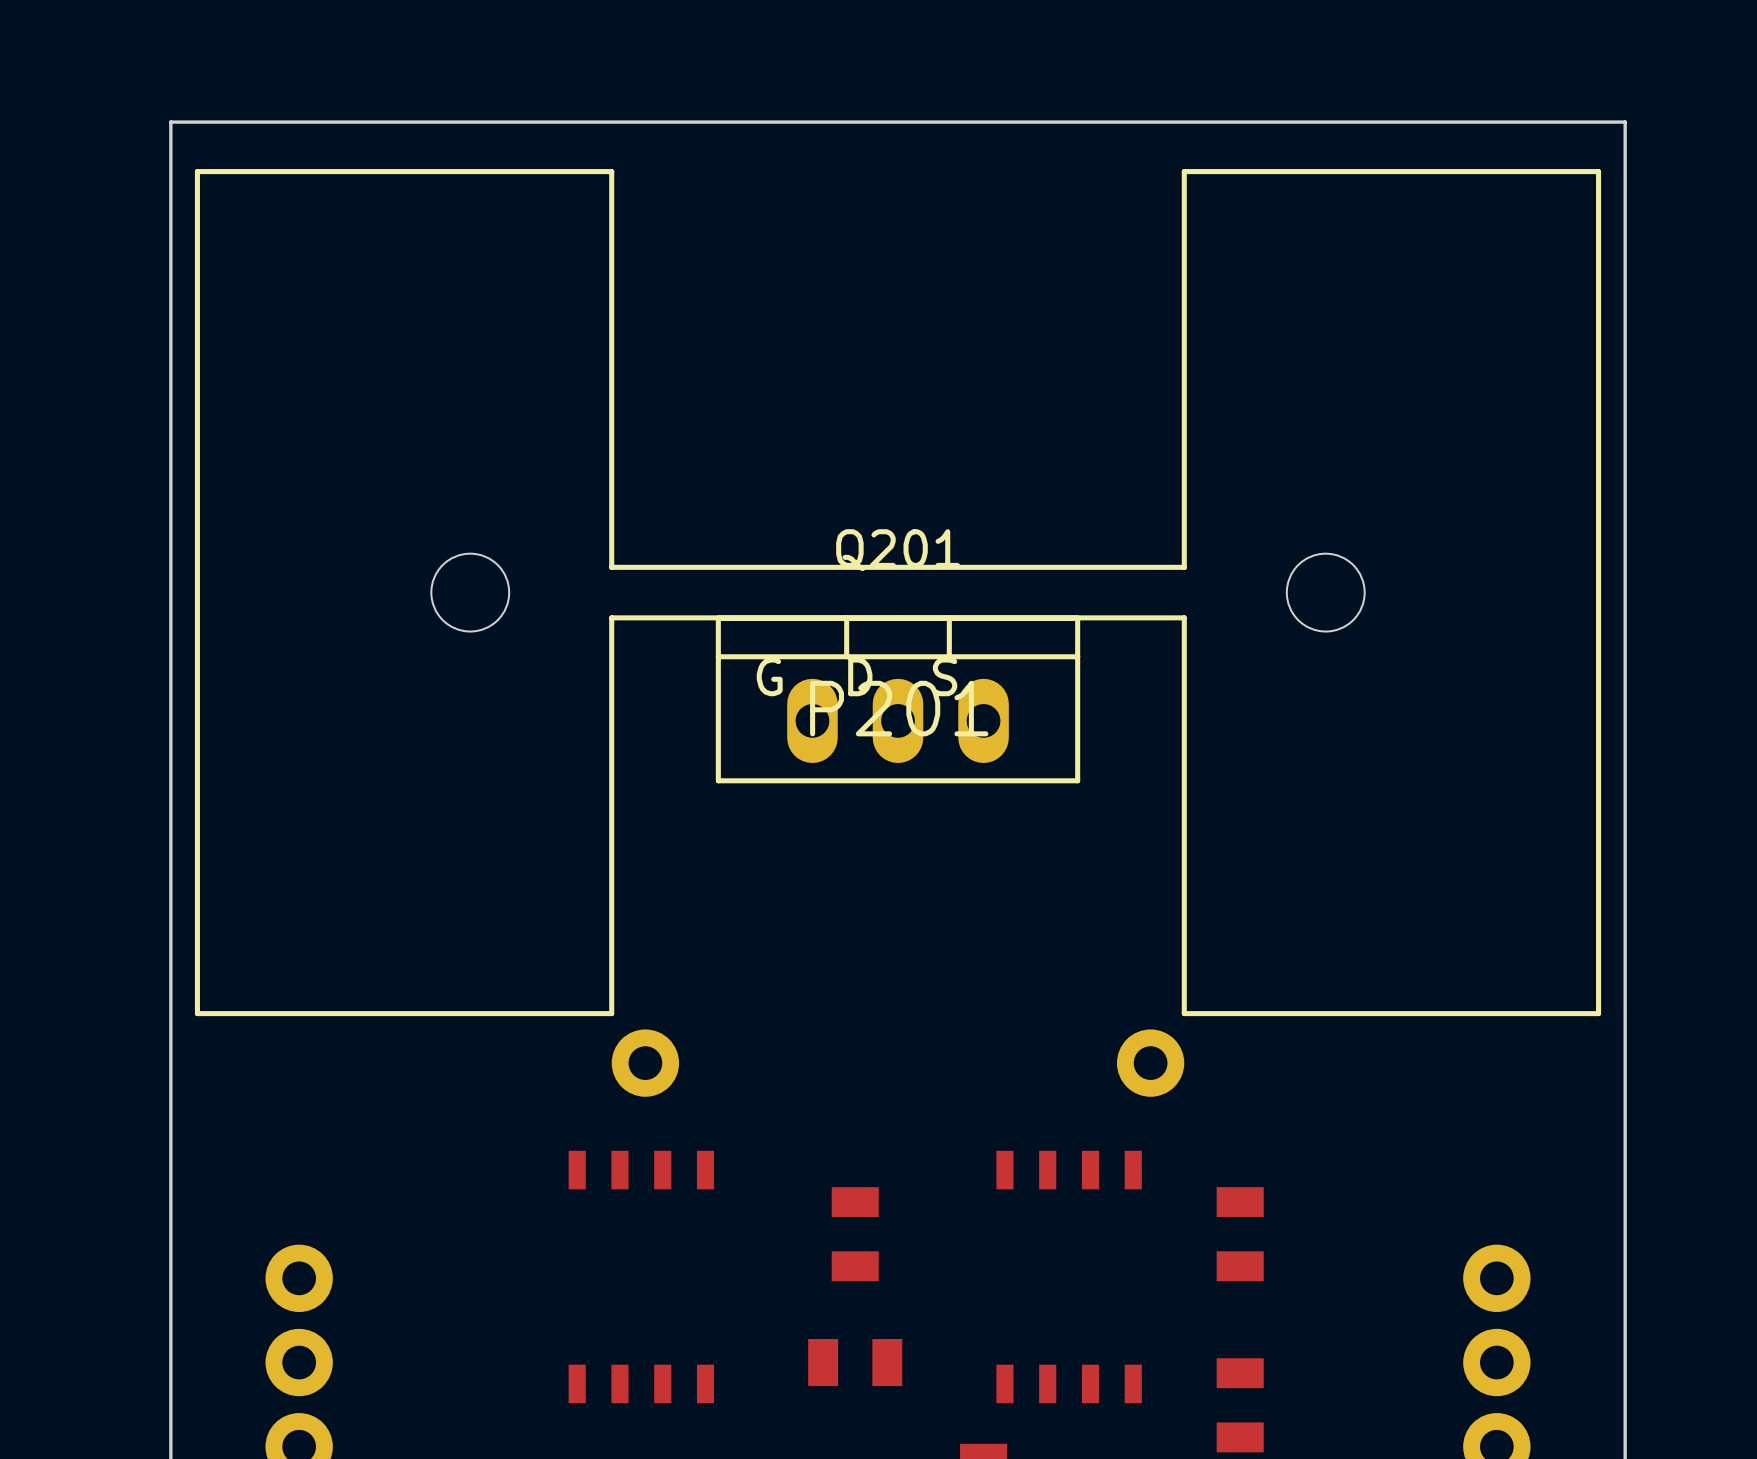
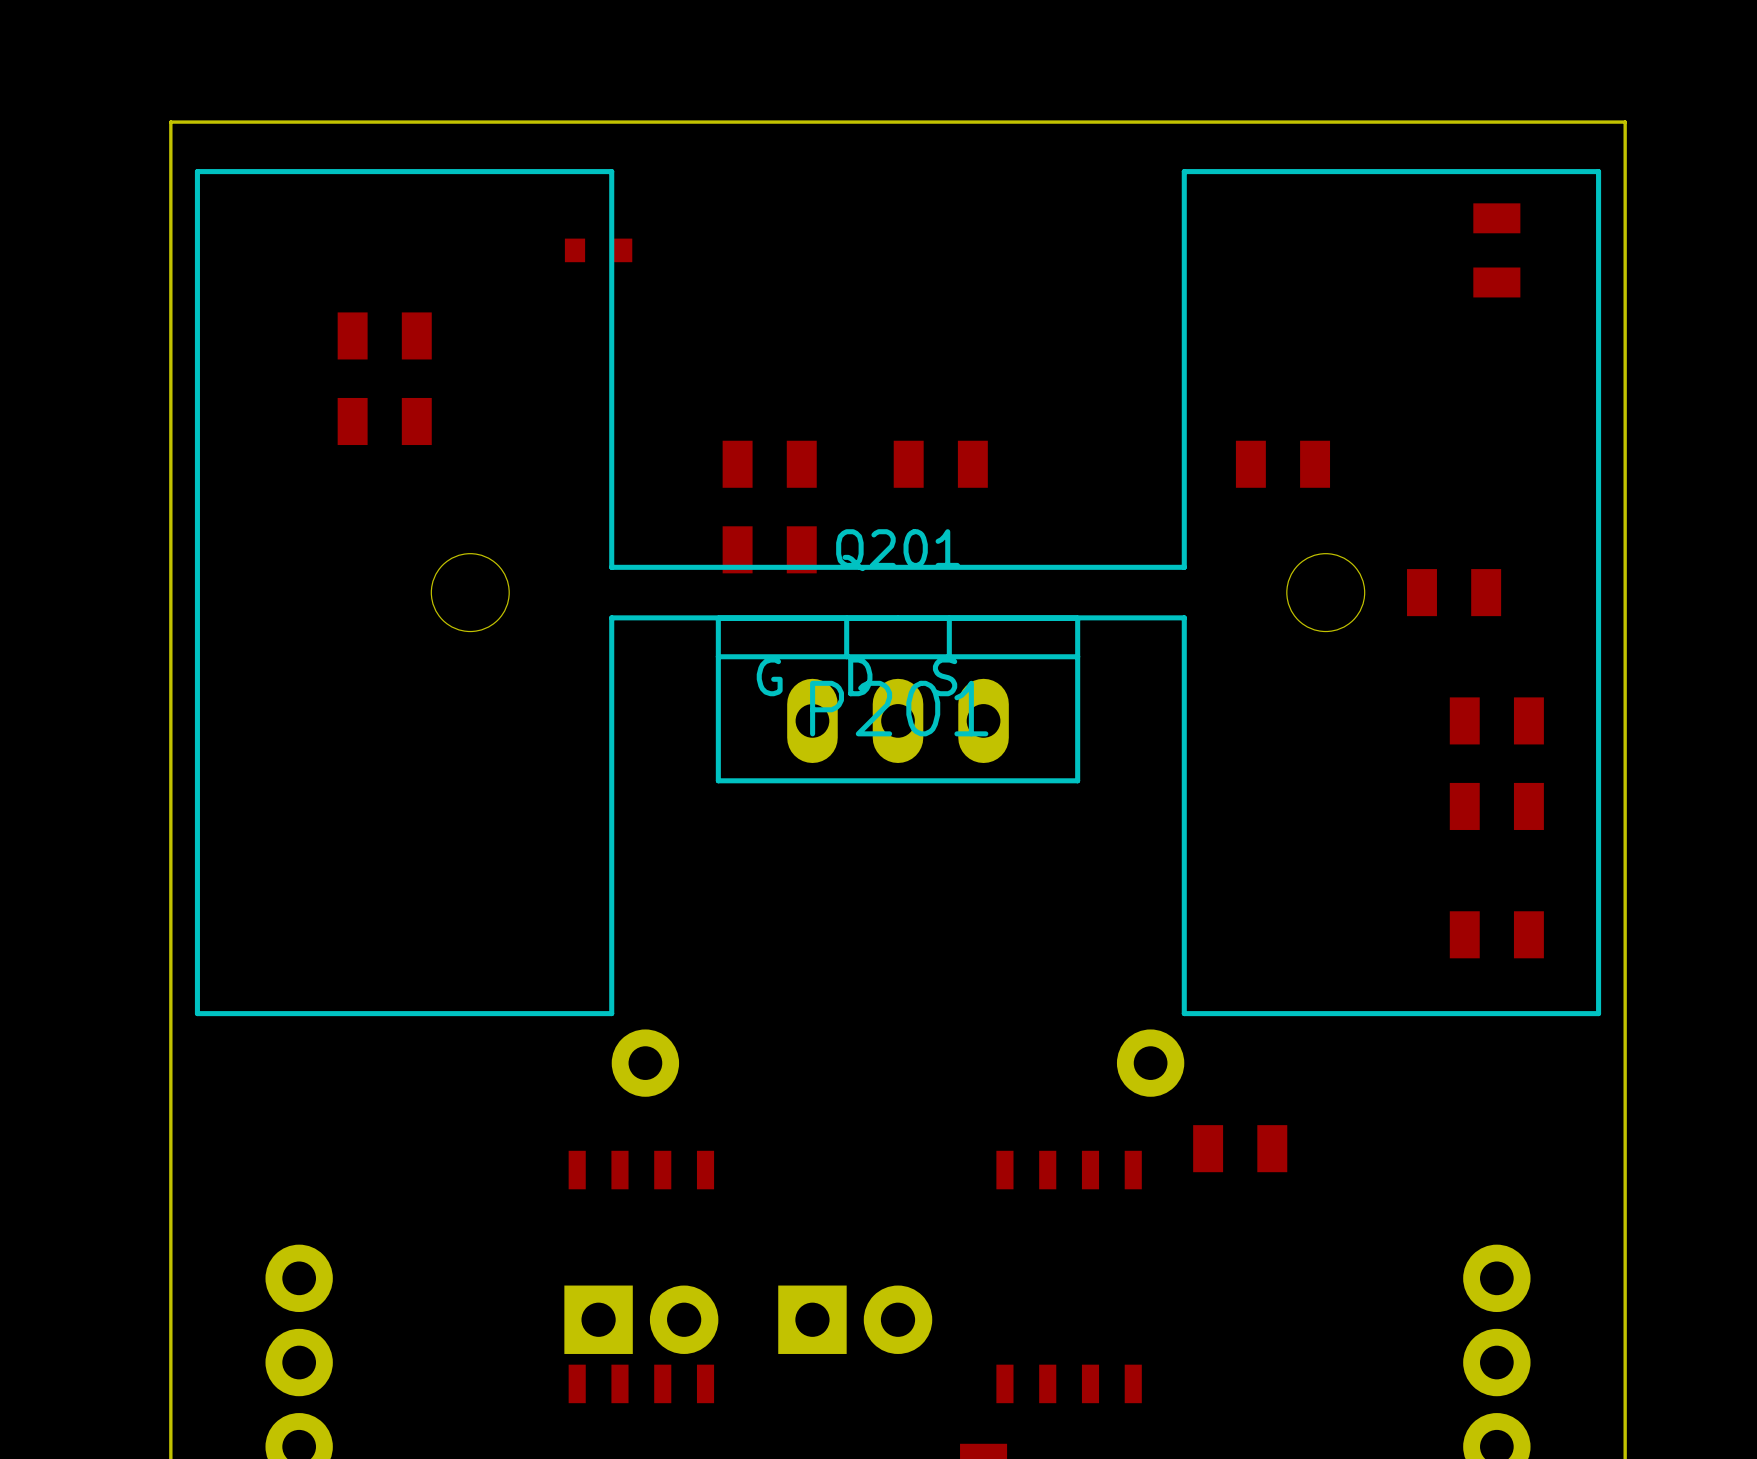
part: none -> (598, 250)
part: none -> (1496, 250)
part: none -> (384, 335)
part: none -> (384, 421)
part: none -> (769, 464)
part: none -> (940, 464)
part: none -> (1282, 464)
part: none -> (769, 549)
part: none -> (1454, 592)
part: none -> (1496, 720)
part: none -> (1496, 806)
part: none -> (1496, 934)
part: (855, 1234) -> none
part rotation: 0° (1240, 1234) -> 90° clockwise (1240, 1148)
part position: (1240, 1234) -> (1240, 1148)
part: none -> (641, 1319)
part: none -> (855, 1319)
part: (855, 1362) -> none
part: (1240, 1405) -> none

